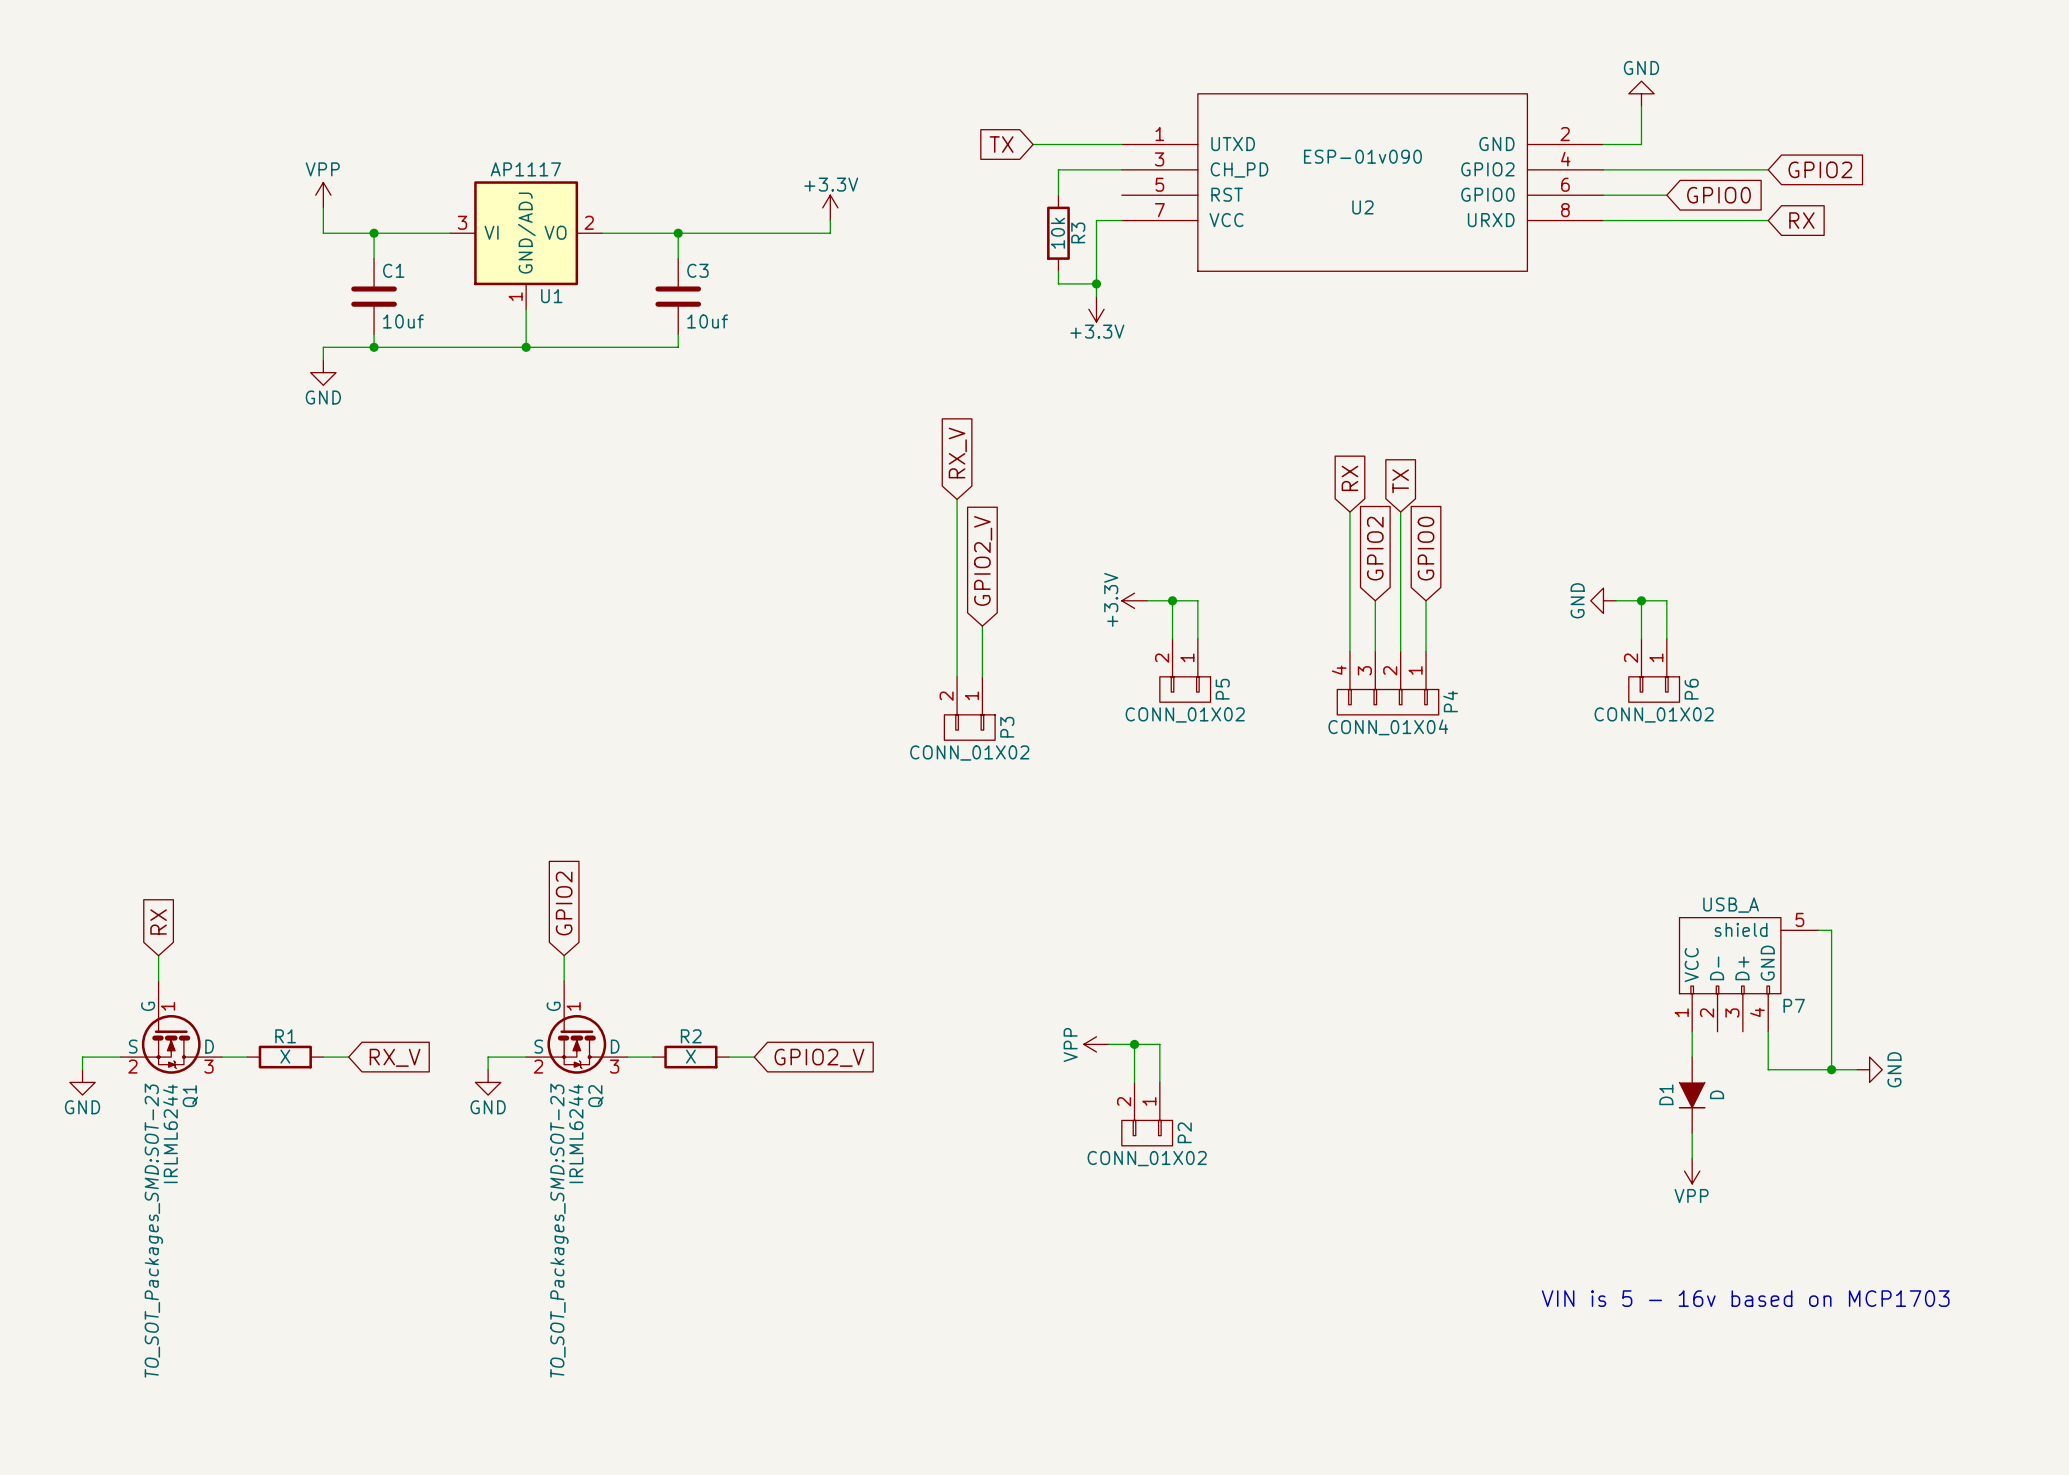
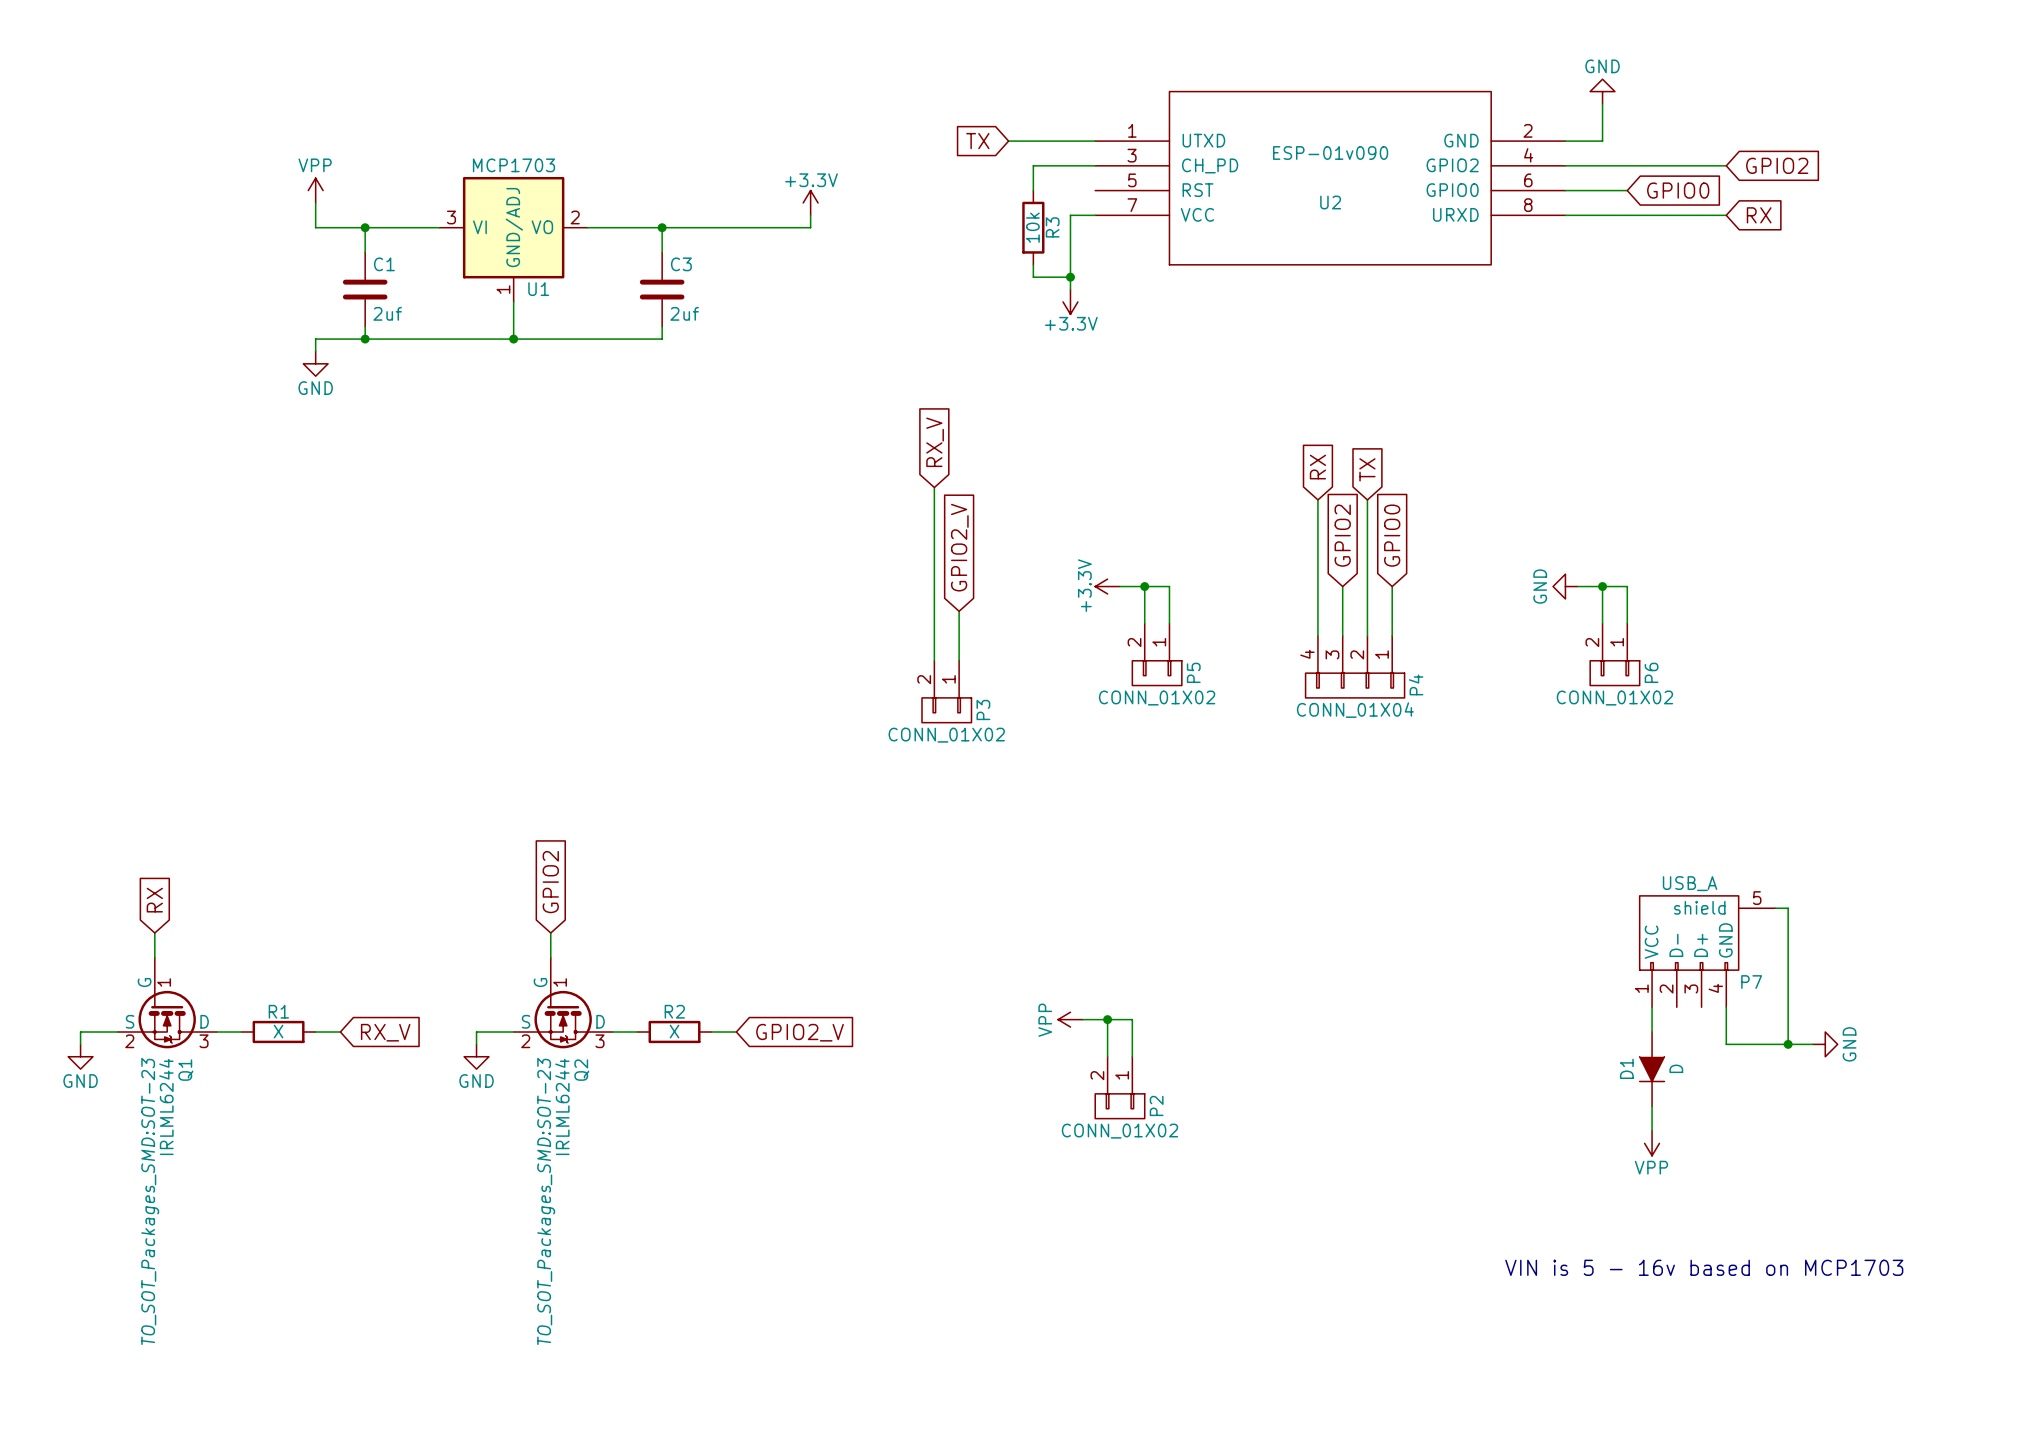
U1 value: AP1117 (525, 169) -> MCP1703 (513, 165)
C1 value: 10uf (403, 321) -> 2uf (387, 313)
C3 value: 10uf (707, 321) -> 2uf (684, 313)

